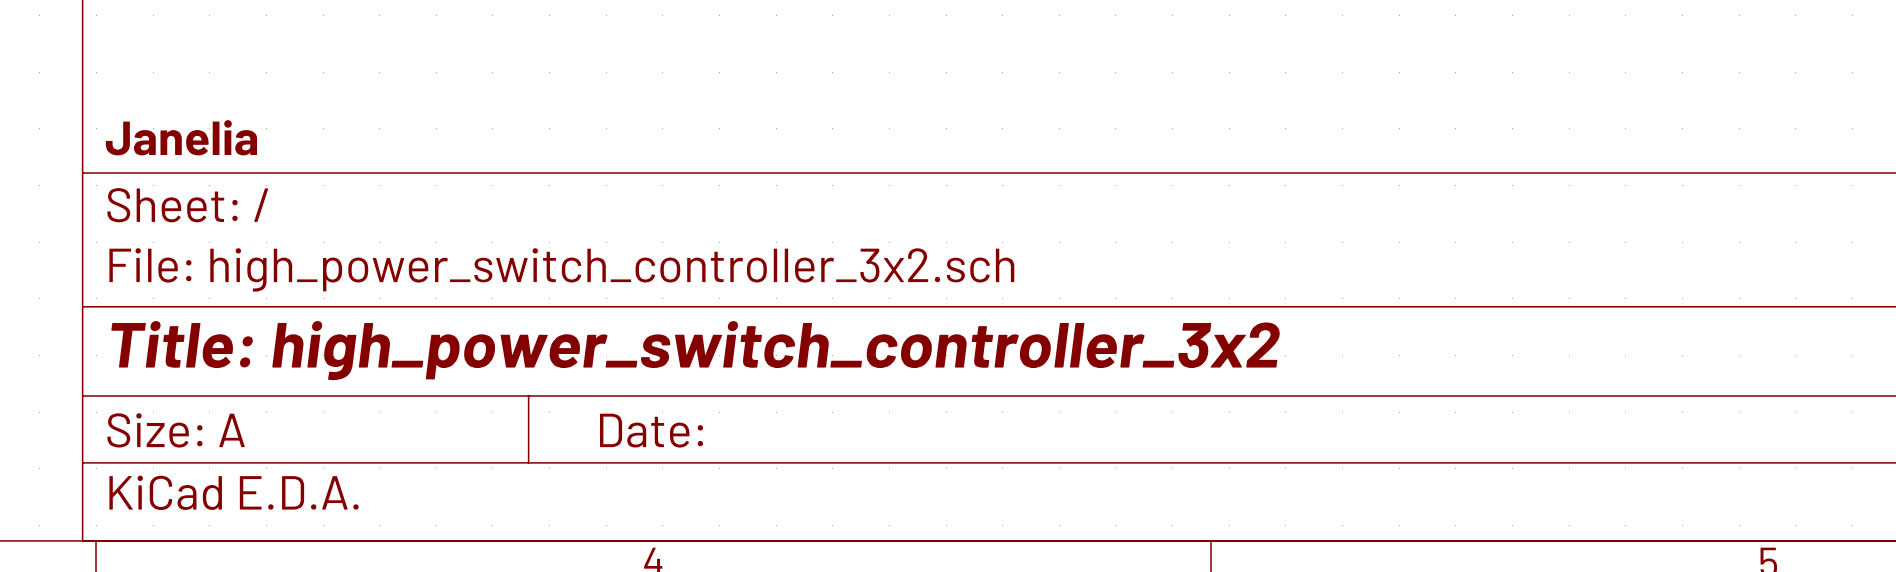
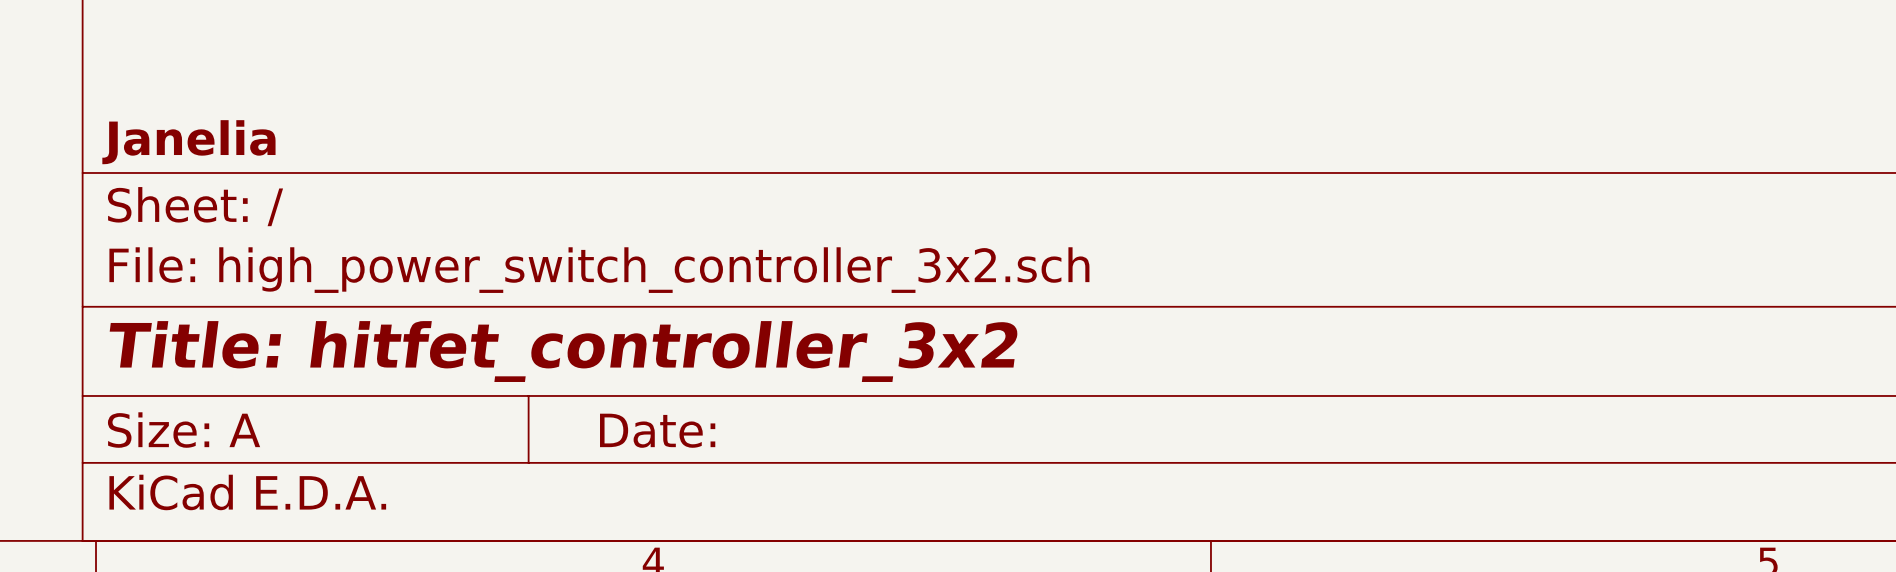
title block: Title: high_power_switch_controller_3x2 (695, 350) -> Title: hitfet_controller_3x2 (563, 351)

